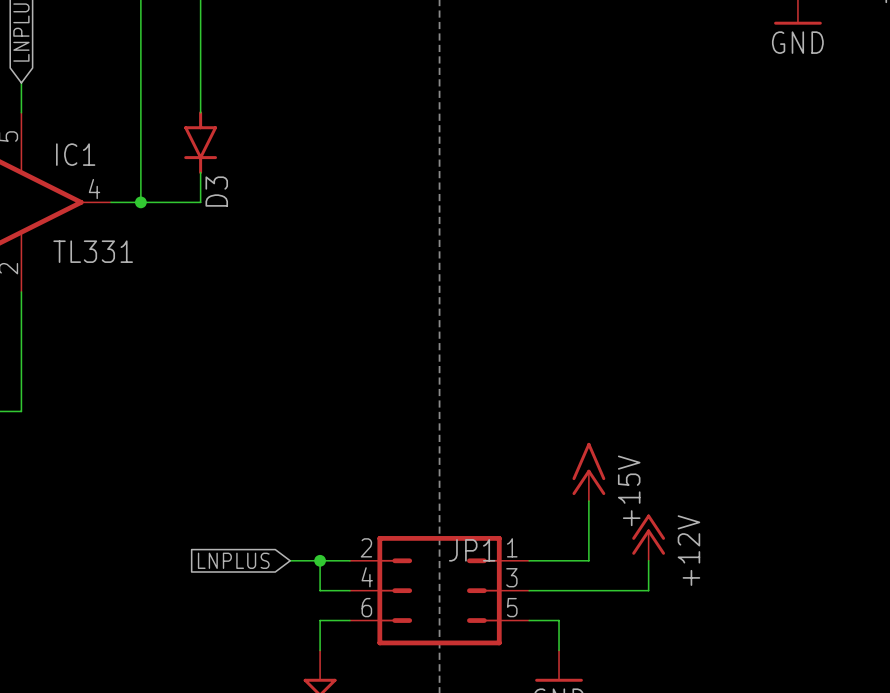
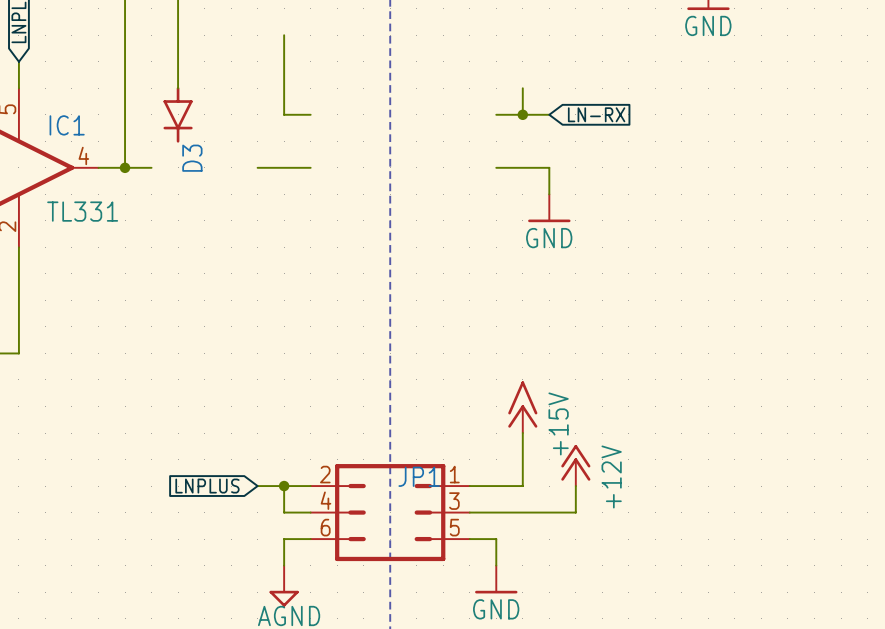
wire: none -> (284, 35) (284, 114) (310, 114)
wire: none -> (522, 88) (522, 114)
wire: none -> (496, 114) (549, 114)
junction: none -> (522, 114)
global label: none -> LN-RX (596, 114)
wire: (200, 172) (200, 202) (170, 202) -> none
wire: none -> (257, 167) (310, 167)
wire: none -> (496, 167) (549, 167) (549, 194)
power symbol: none -> GND (549, 208)

